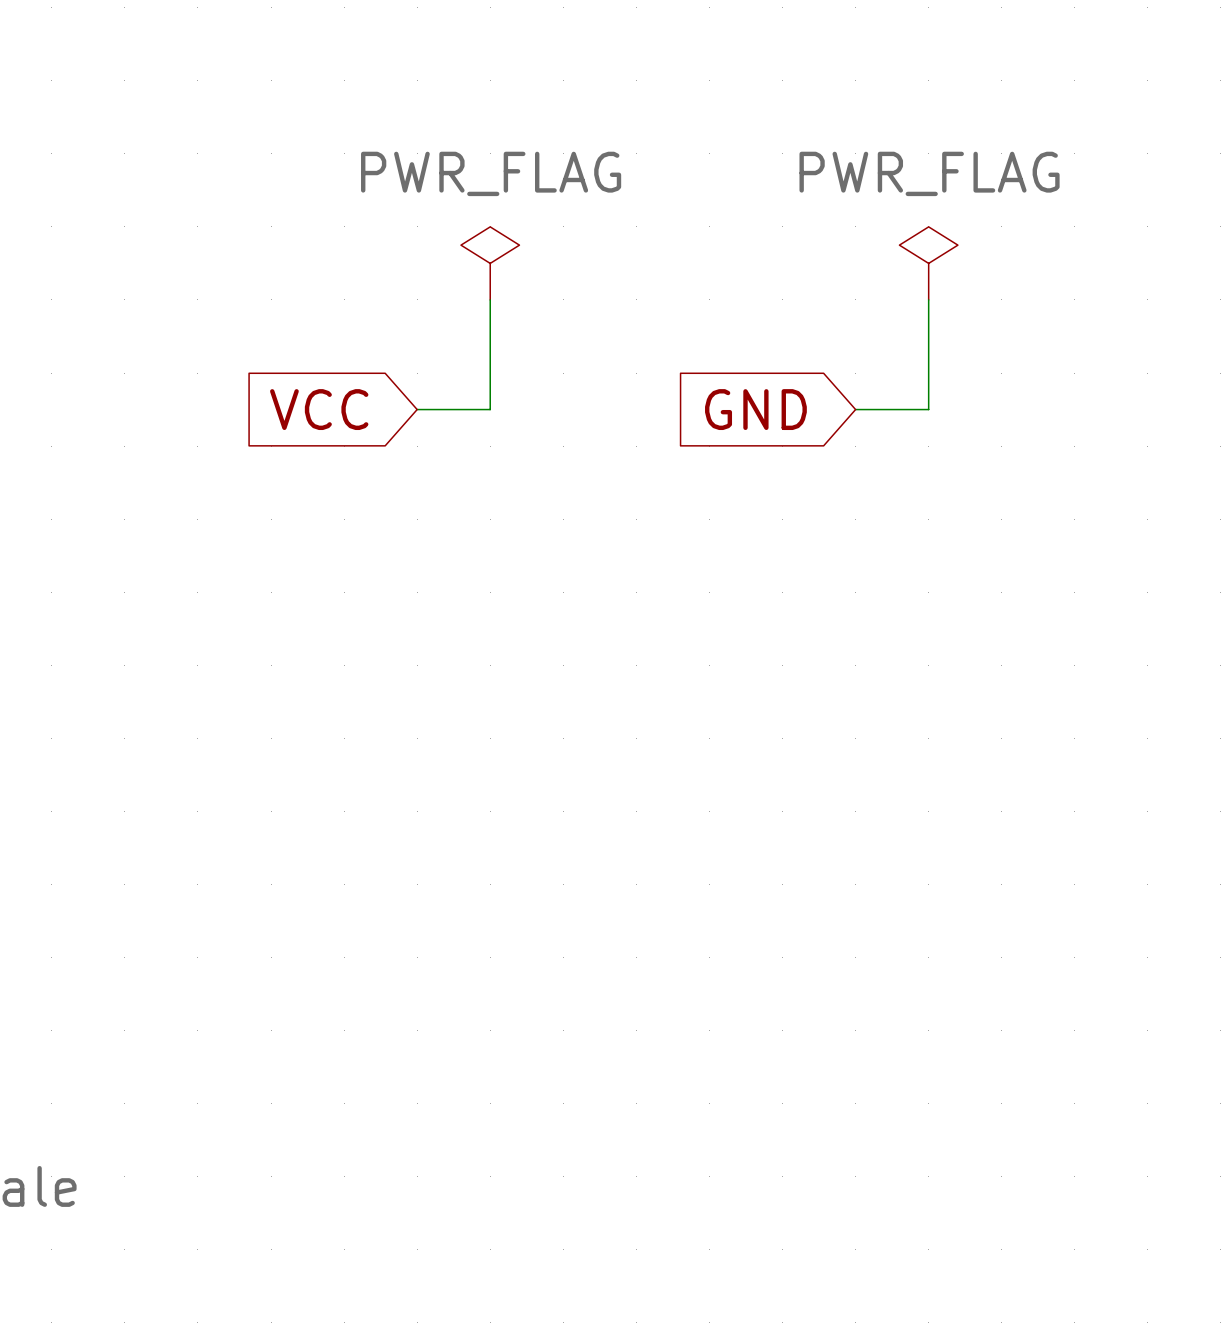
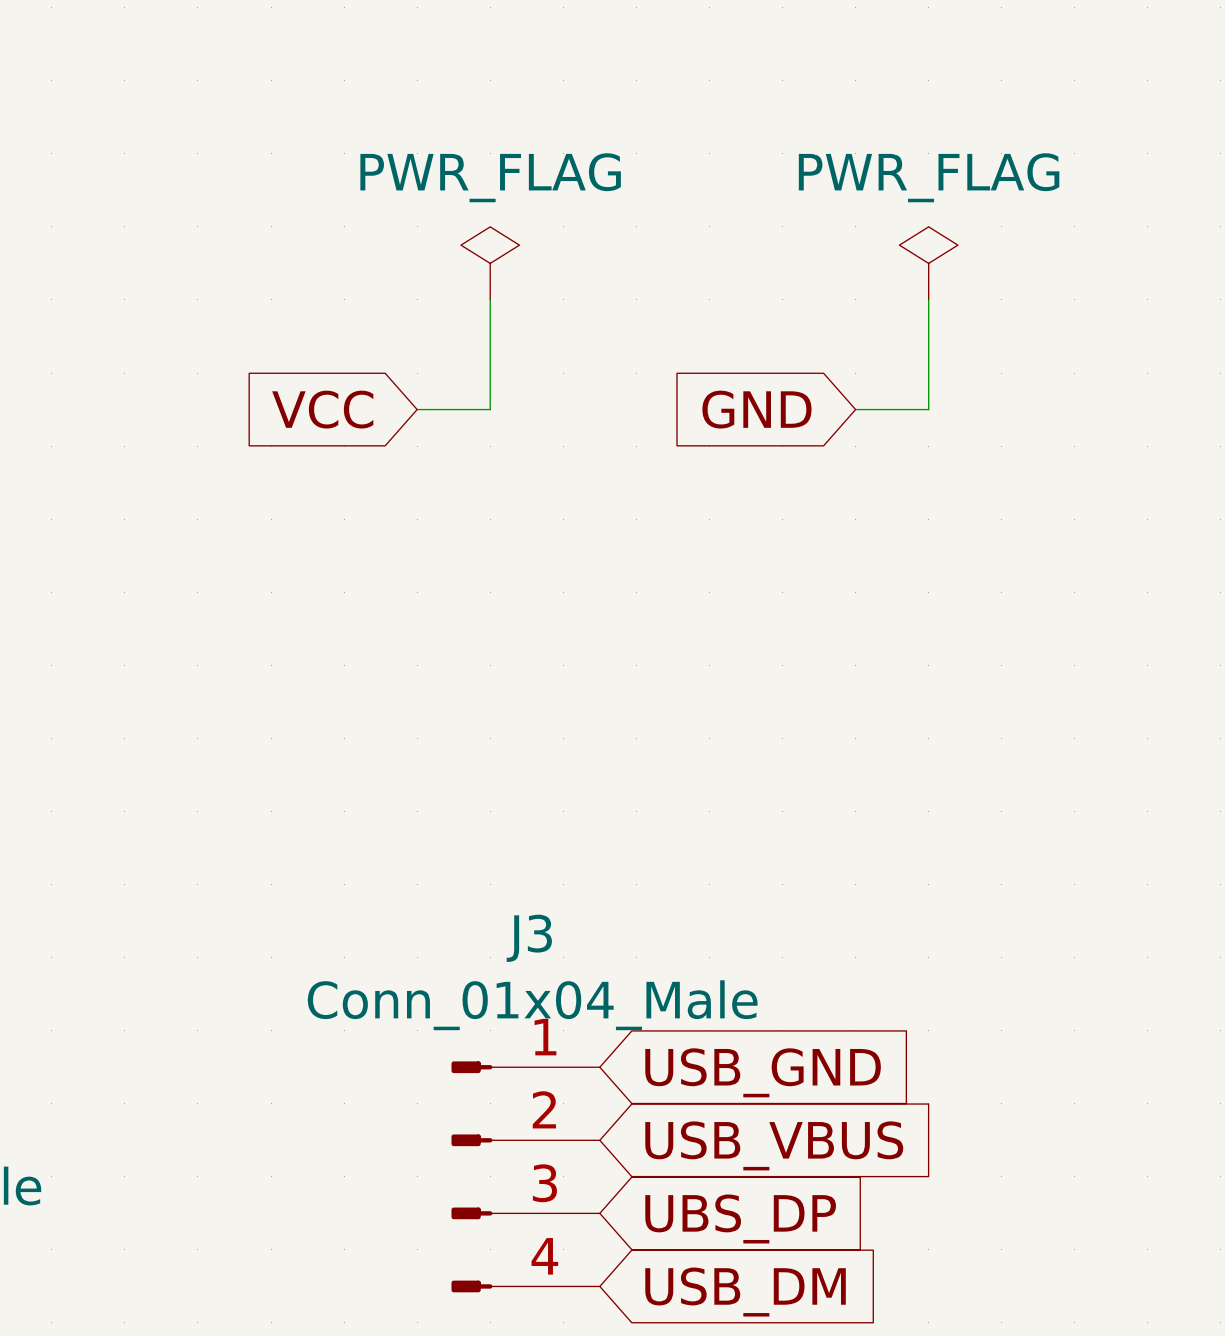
global label: none -> USB_GND (763, 1072)
global label: none -> USB_VBUS (774, 1145)
J3: none -> Conn_01x04_Male (525, 1176)
global label: none -> UBS_DP (740, 1218)
global label: none -> USB_DM (745, 1292)

